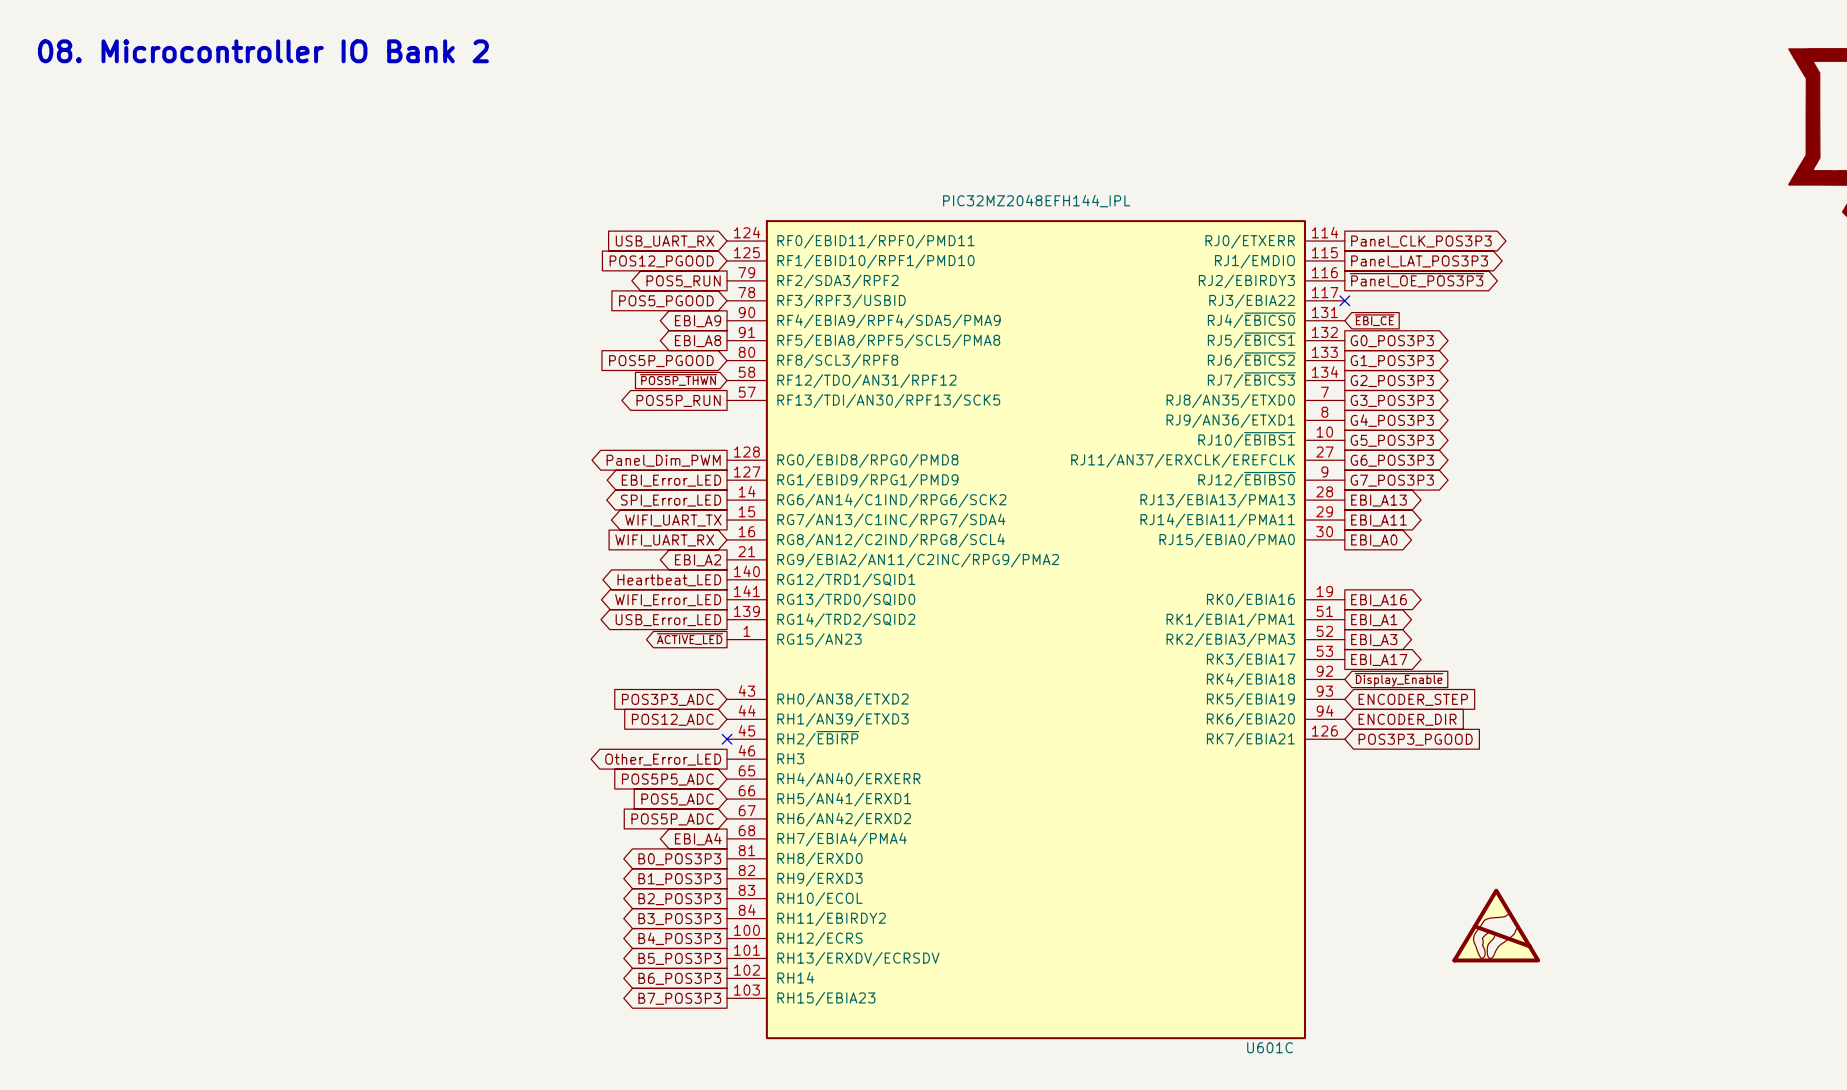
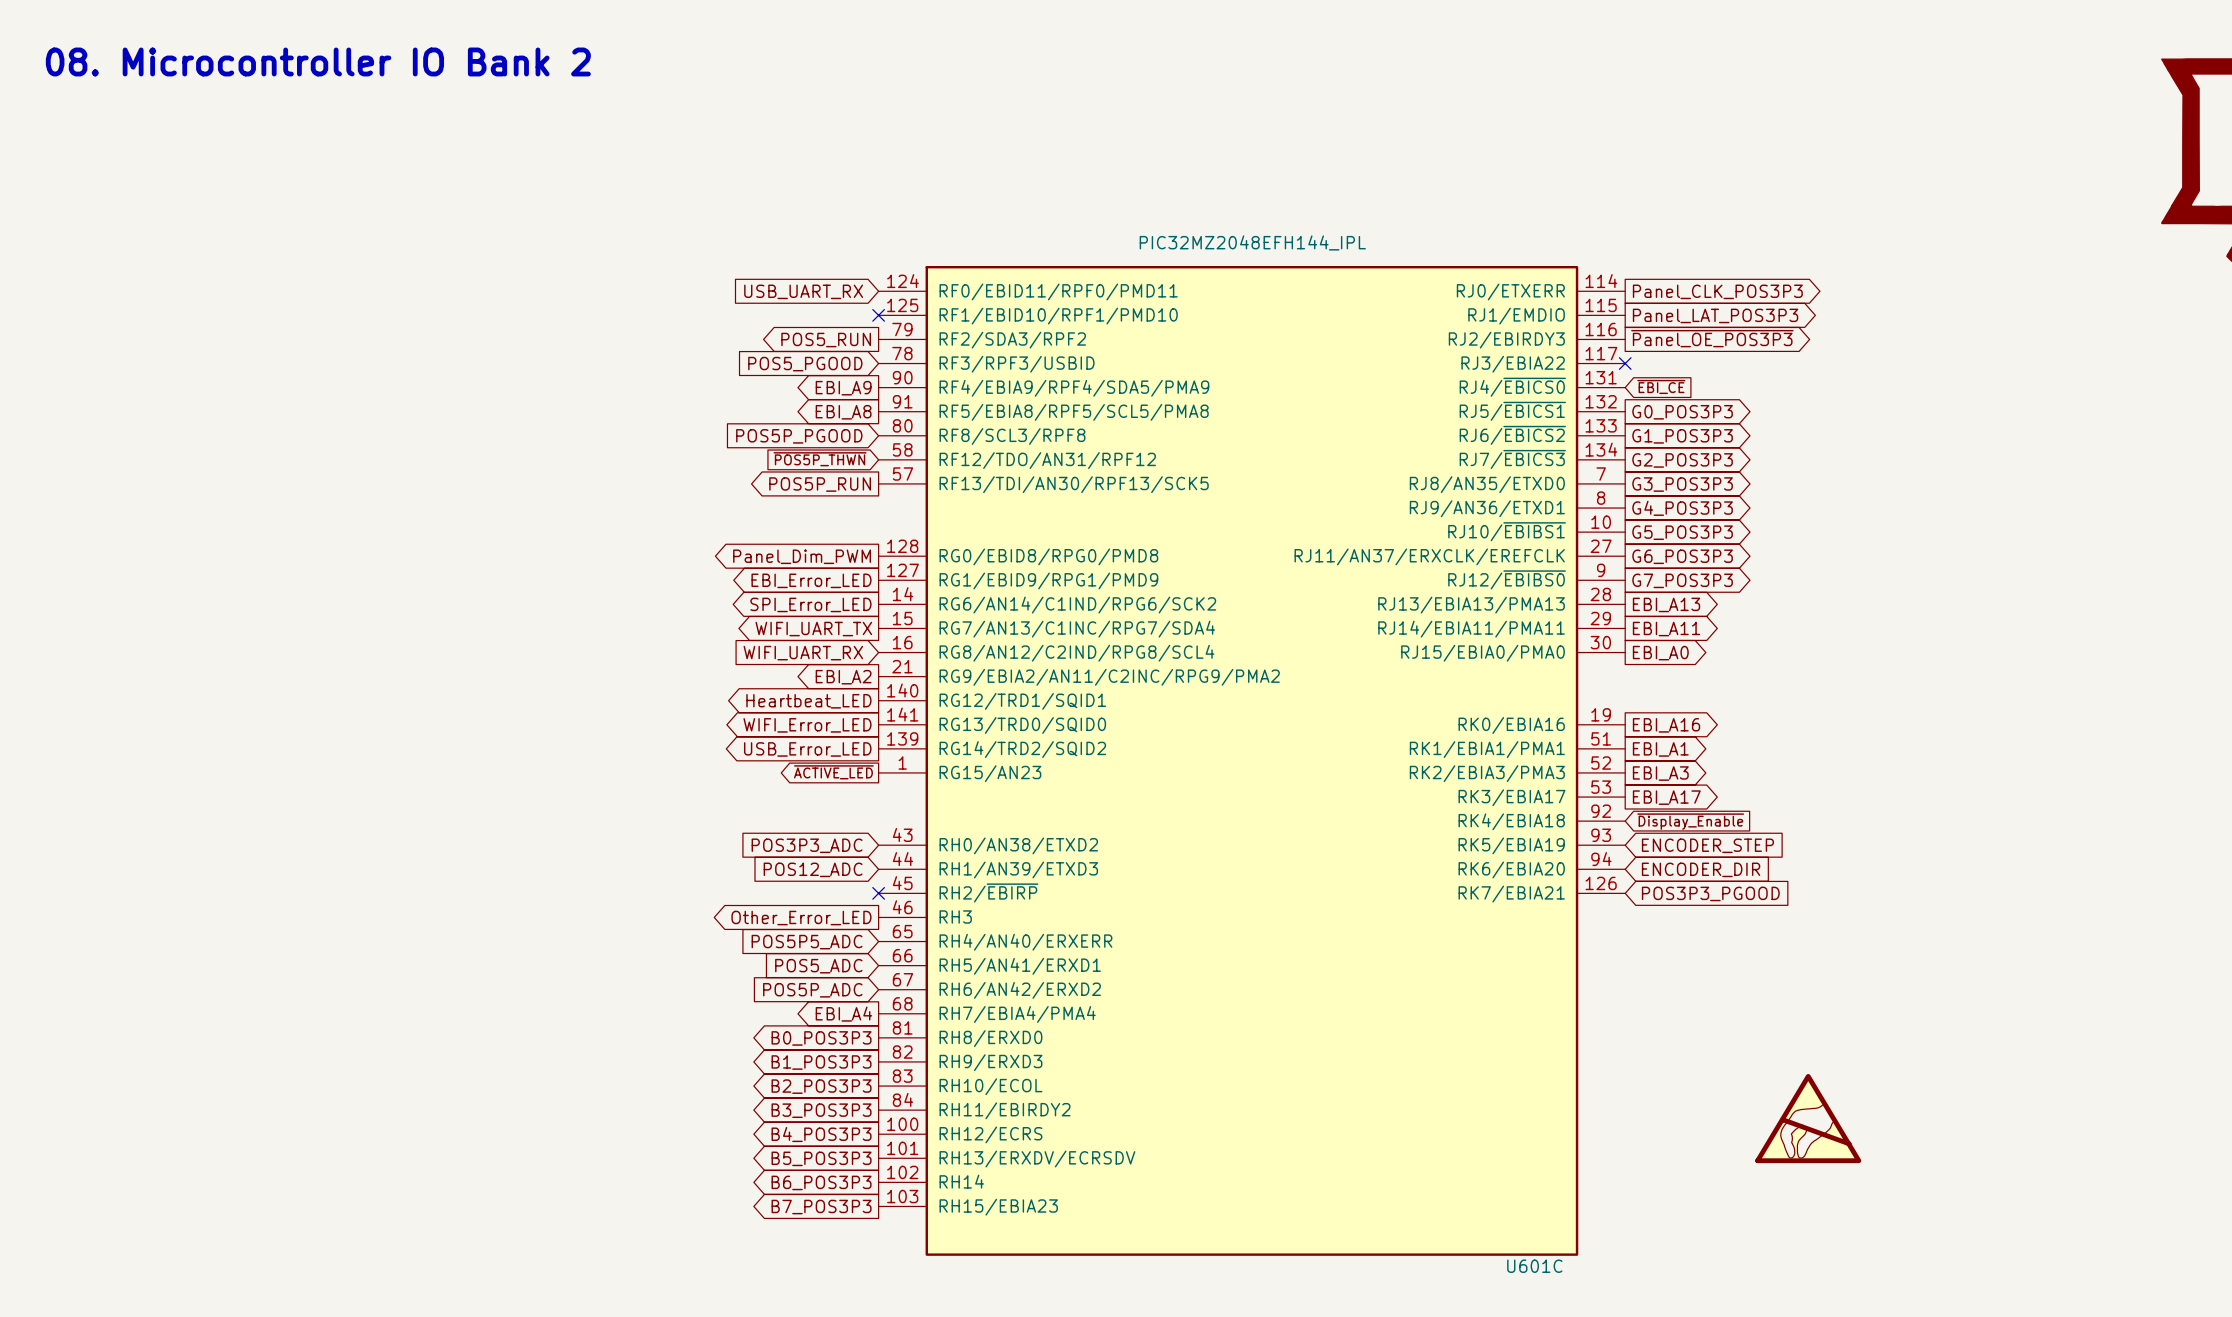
no-connect mark: none -> (878, 315)
global label: POS12_PGOOD (661, 261) -> none

